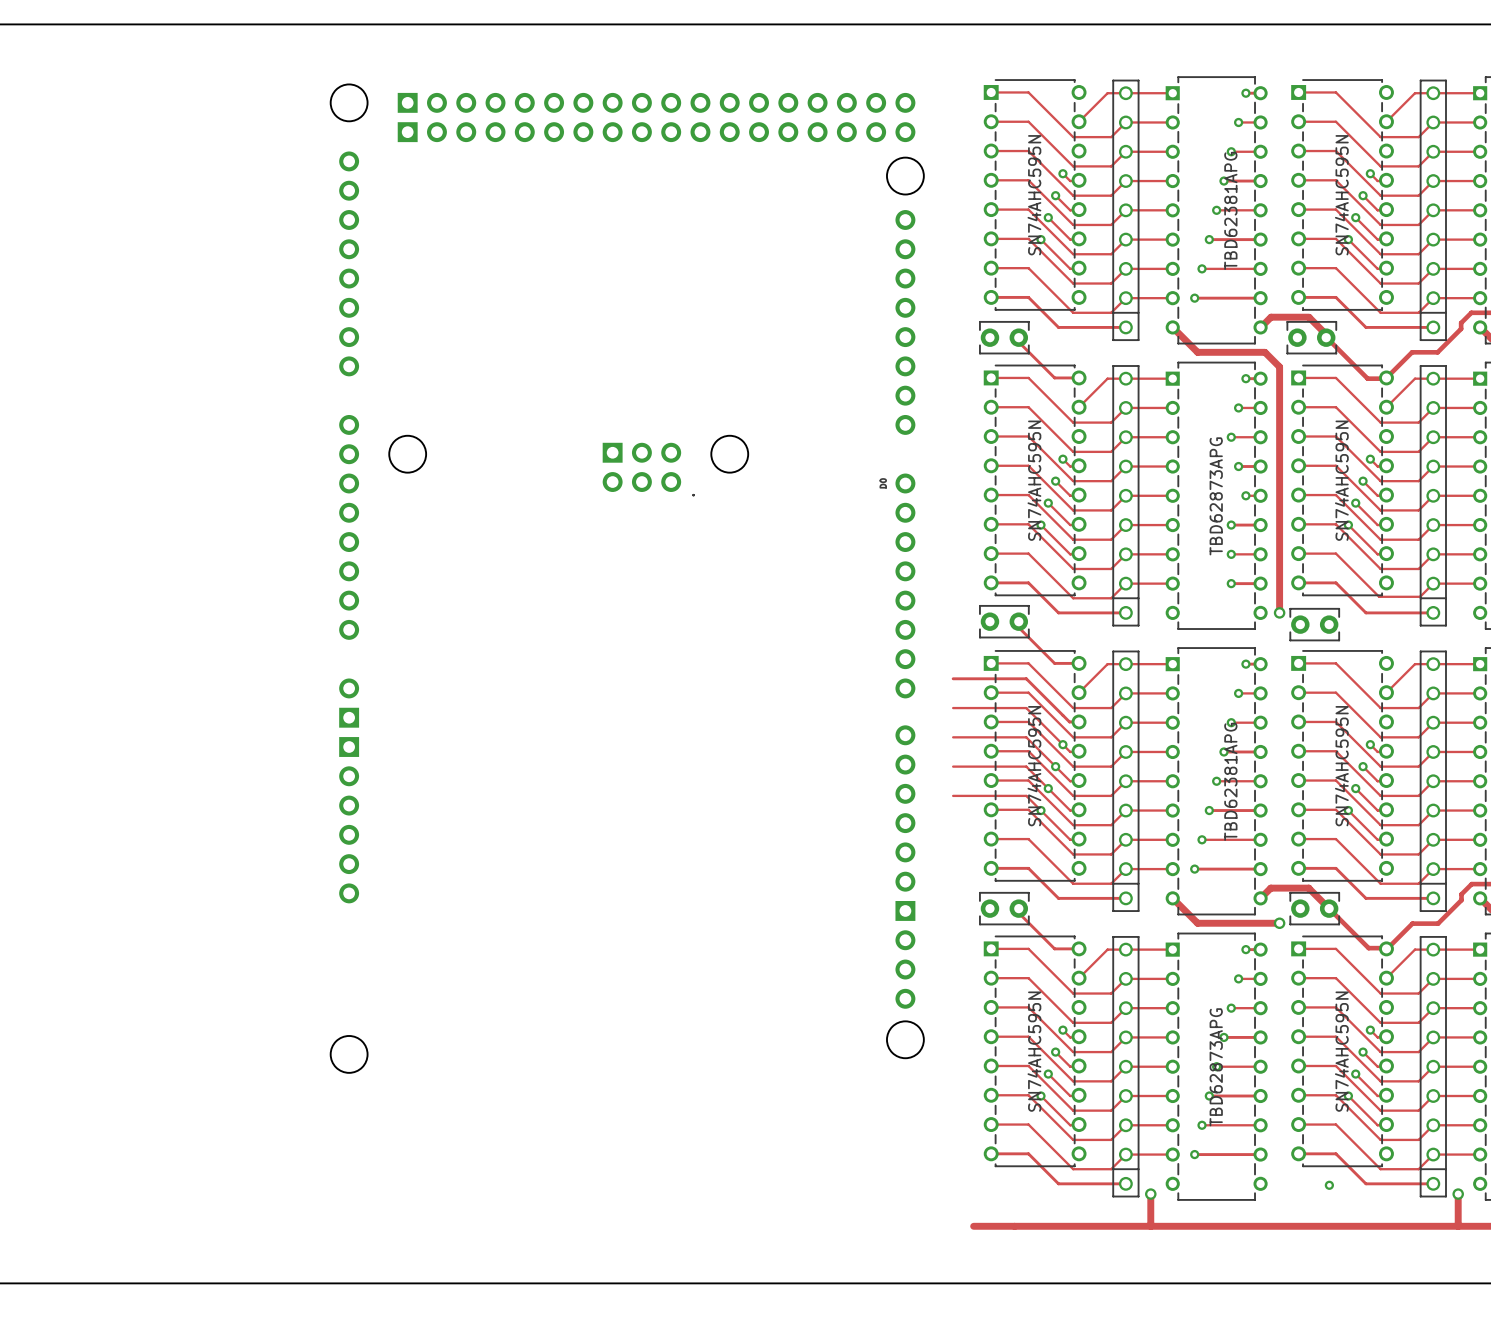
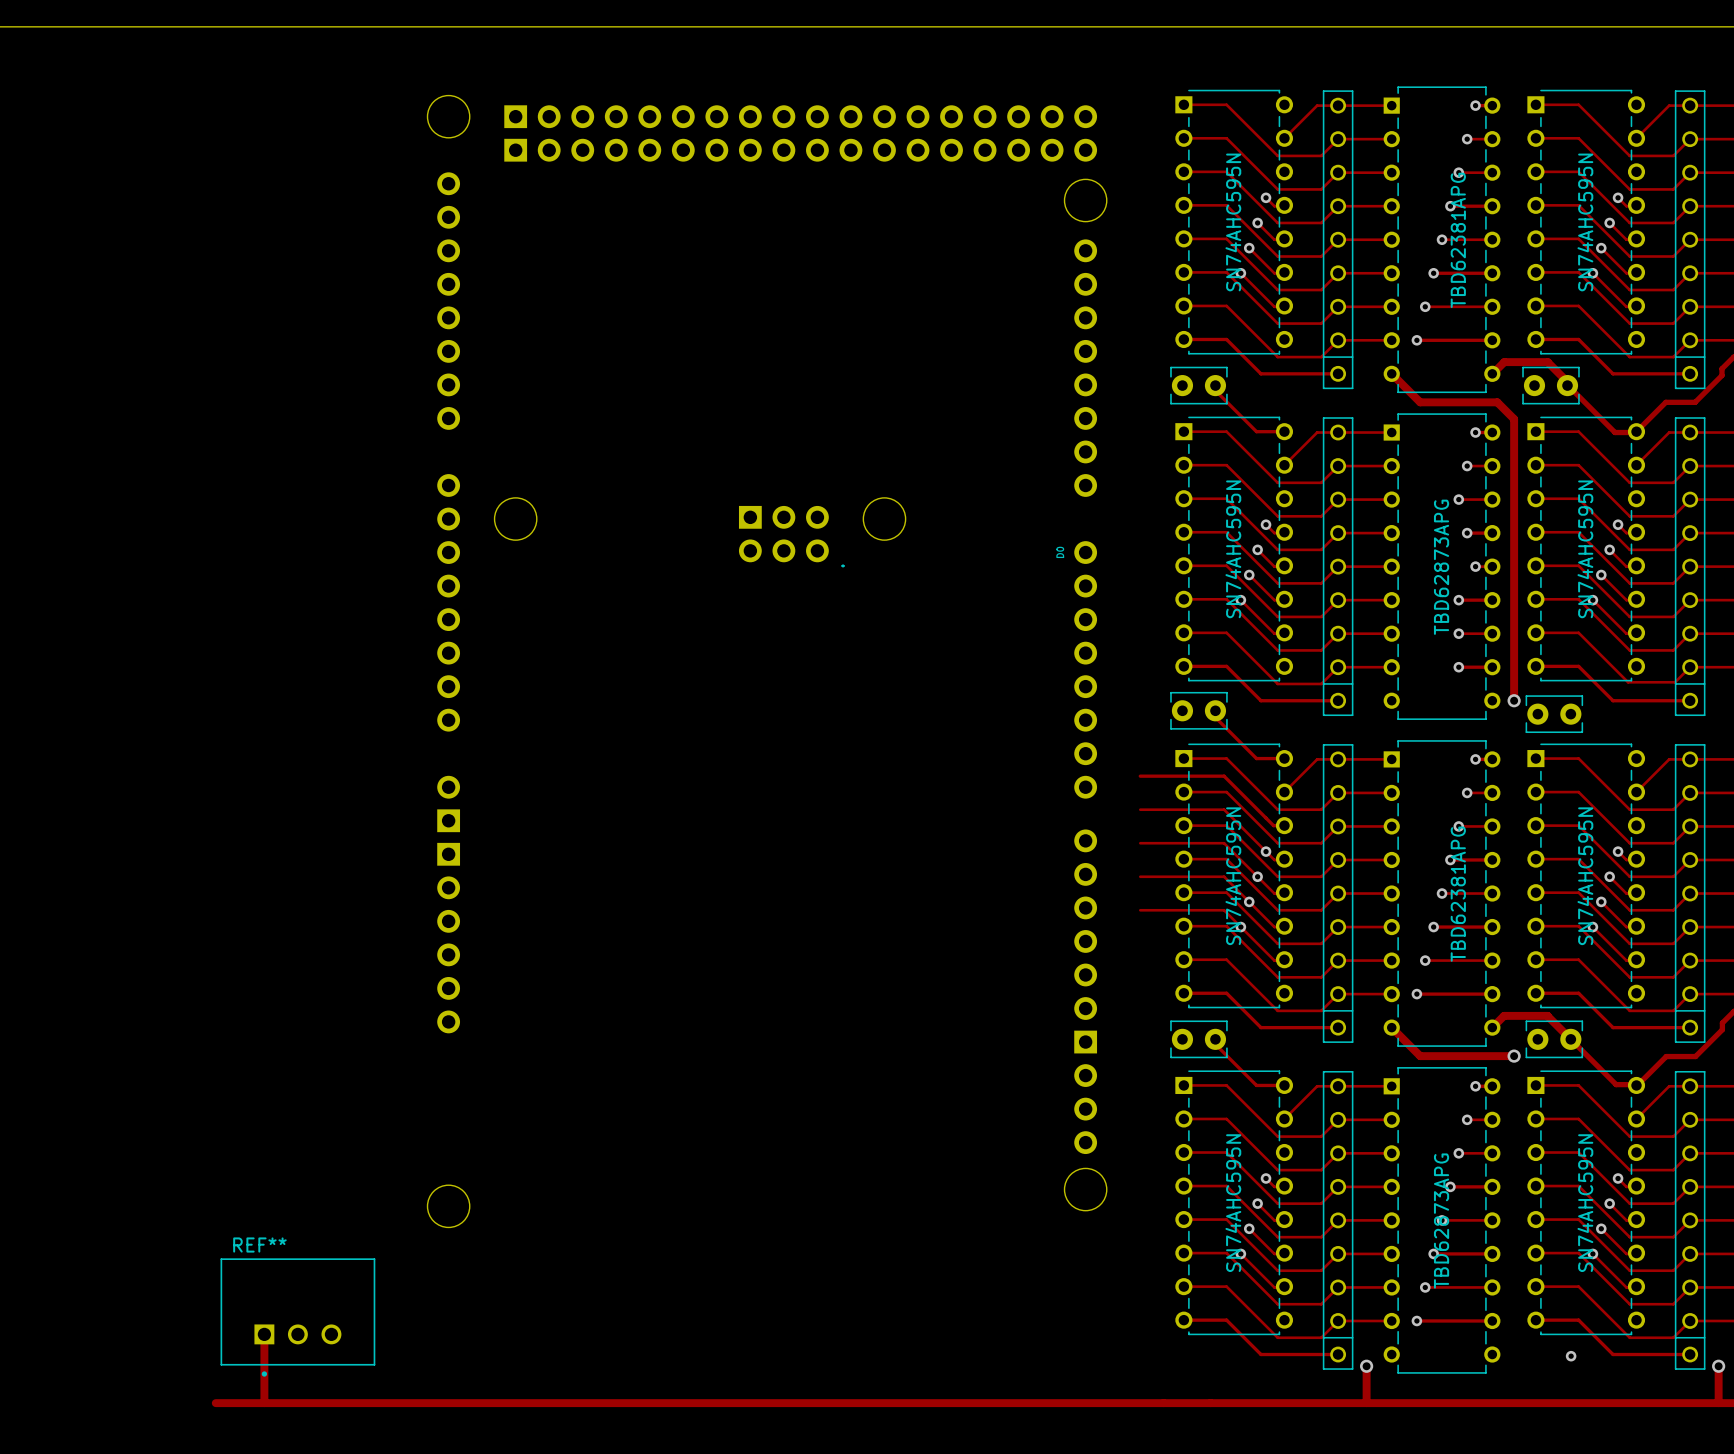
REF**: none -> (297, 1317)
track: none -> (264, 1334) (264, 1403)
track: none -> (215, 1403) (1163, 1403)

